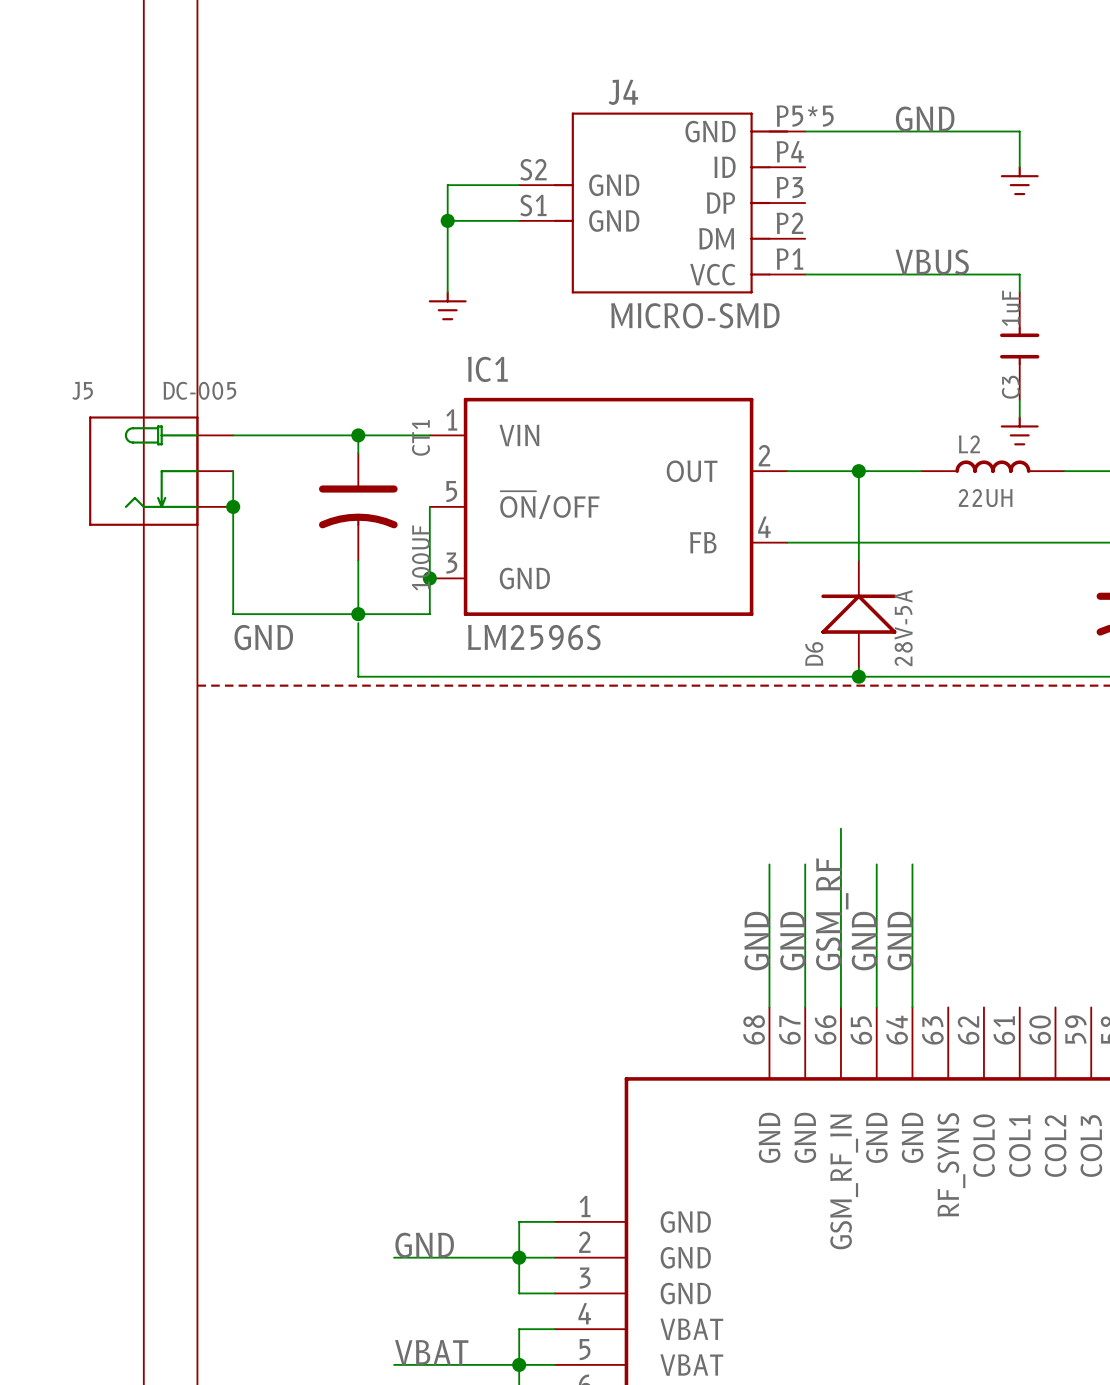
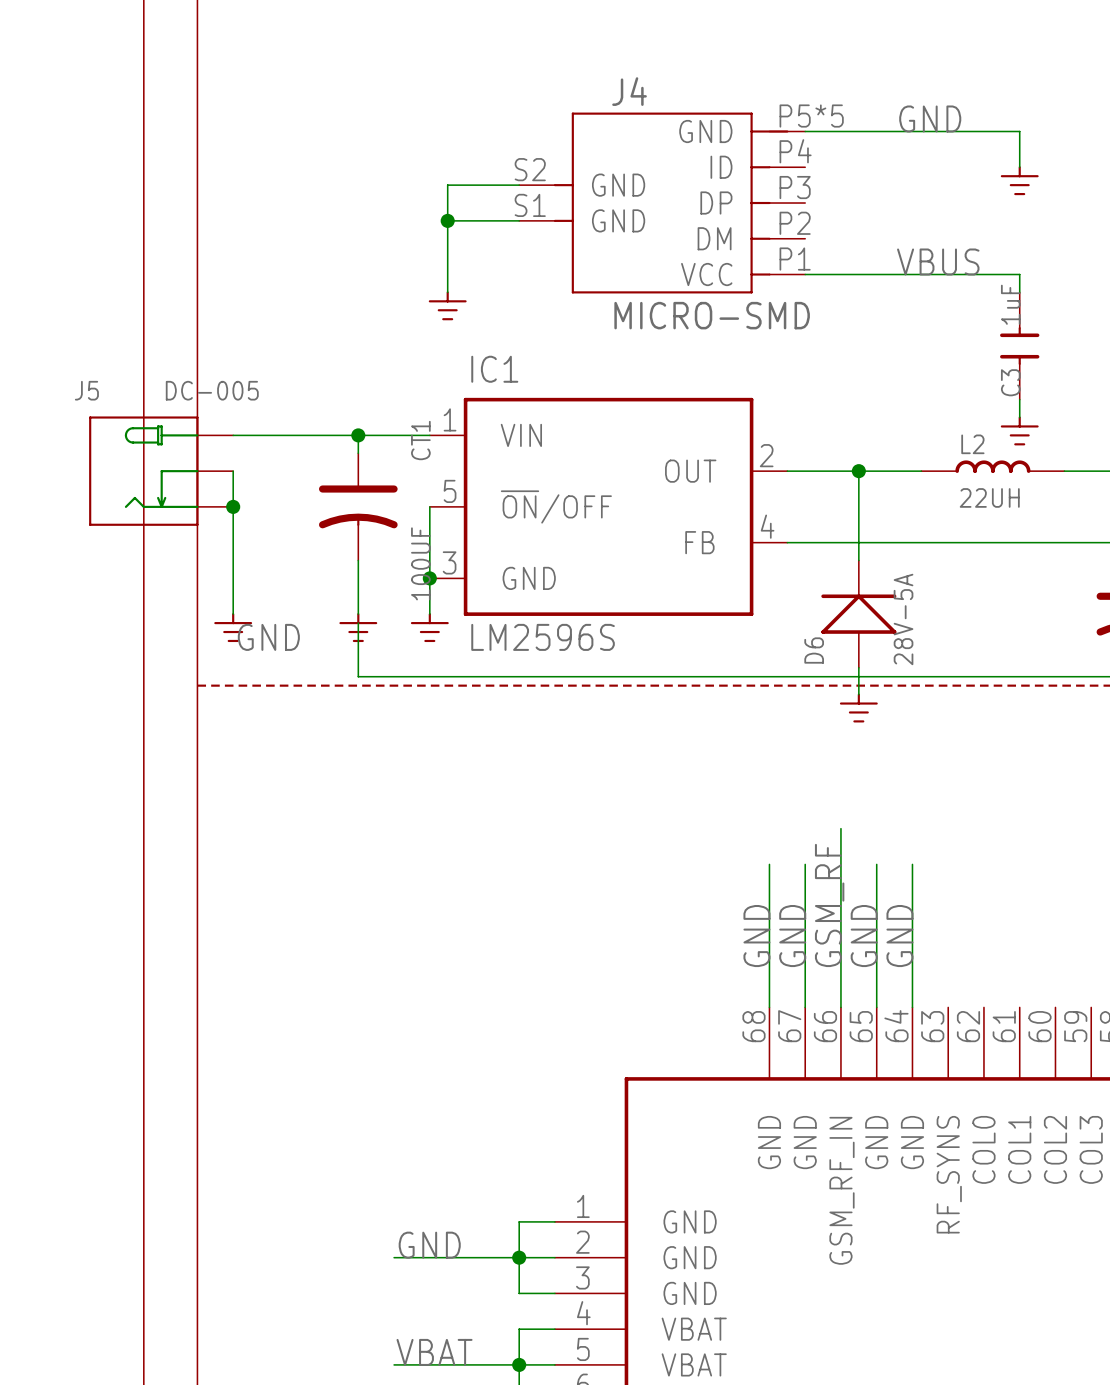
wire: (233, 614) (429, 614) -> none
junction: (358, 614) -> none
power symbol: none -> (233, 627)
power symbol: none -> (358, 627)
power symbol: none -> (429, 627)
wire: none -> (858, 676) (858, 694)
junction: (858, 676) -> none
power symbol: none -> (858, 708)

